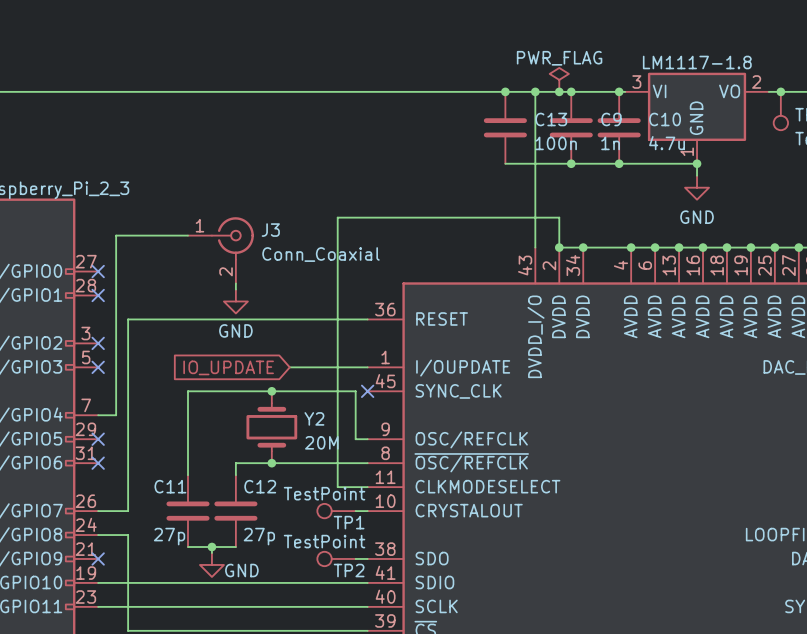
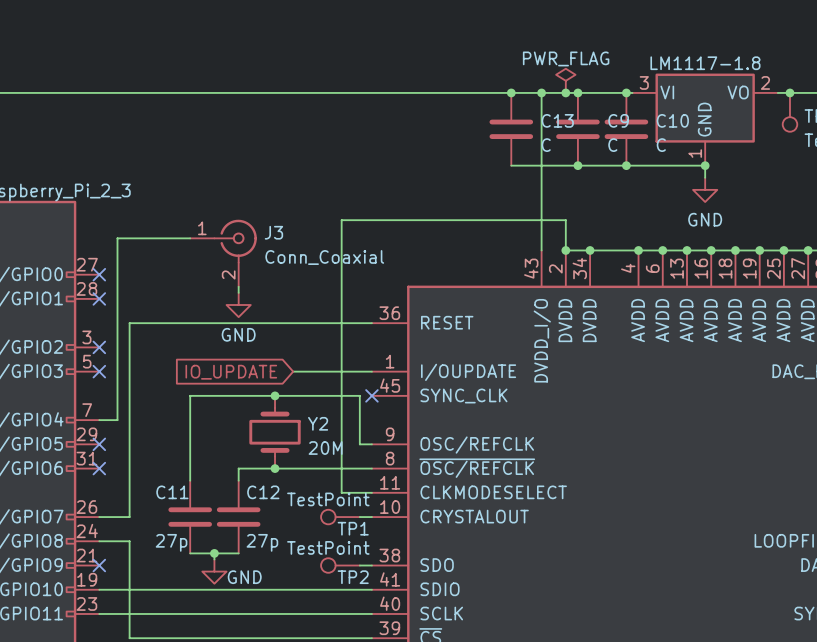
C13 value: 100n (556, 143) -> C (546, 145)
C9 value: 1n (610, 143) -> C (612, 145)
C10 value: 4.7u (667, 143) -> C (661, 145)

